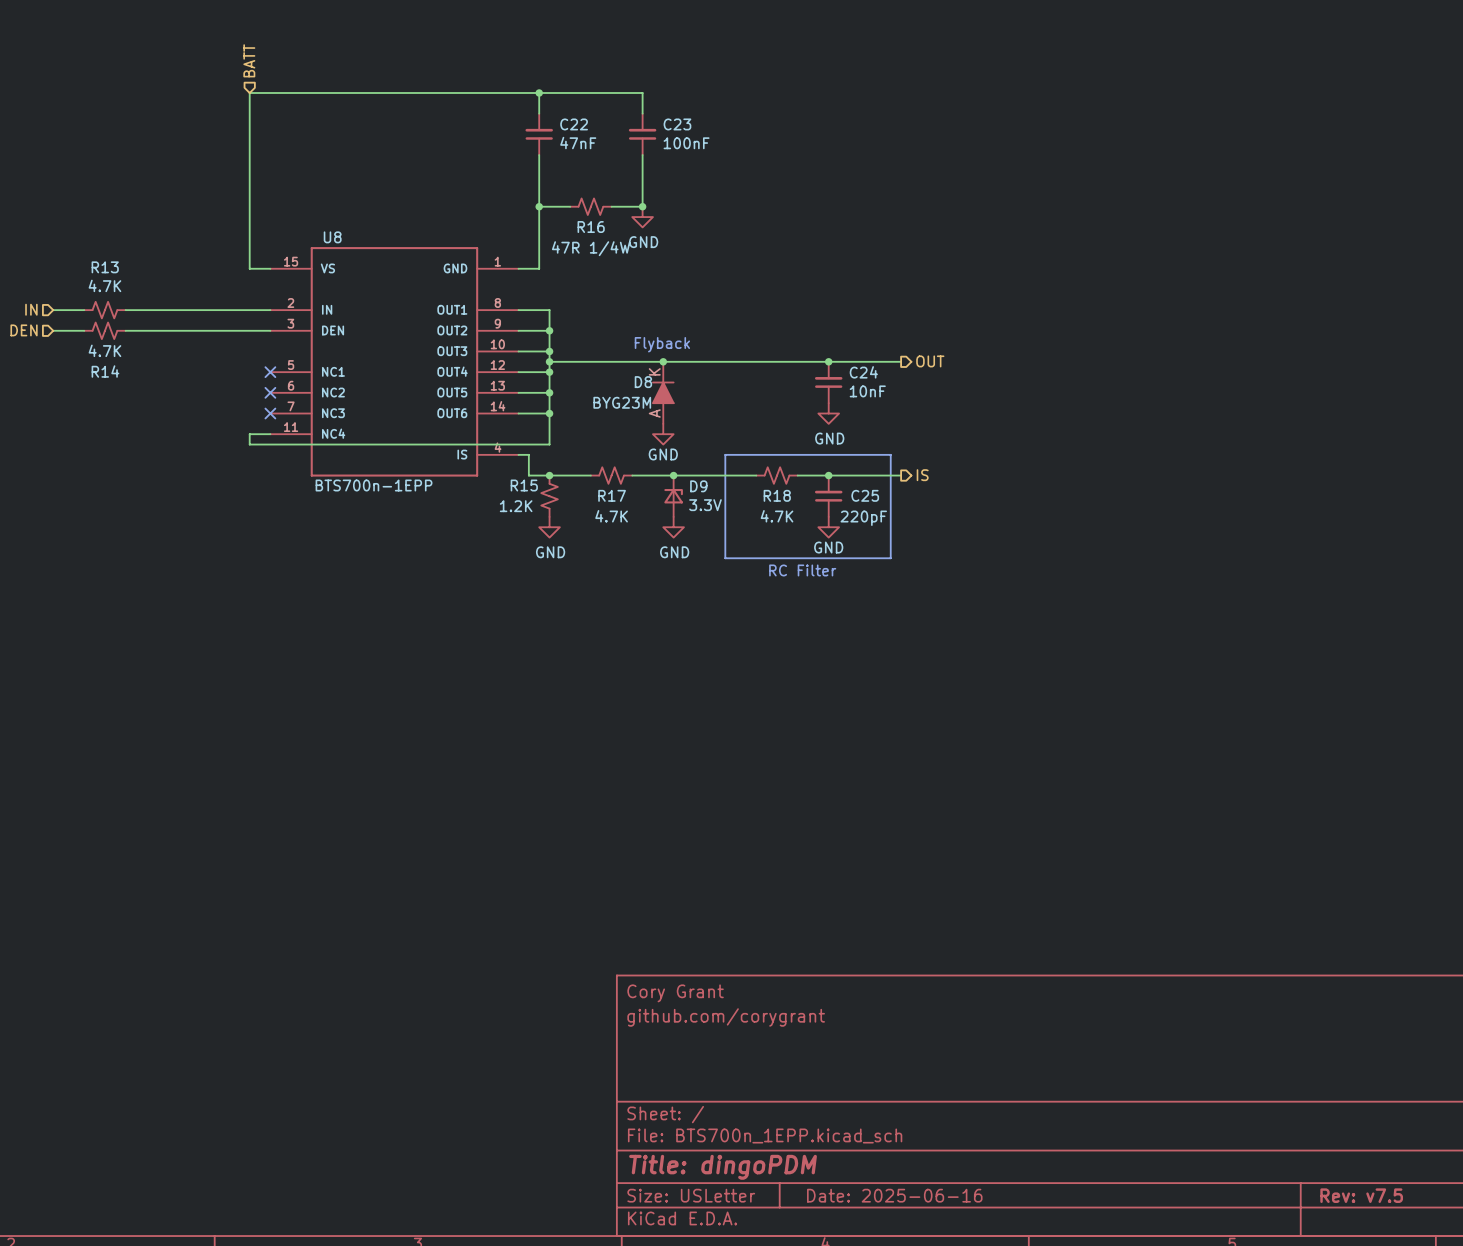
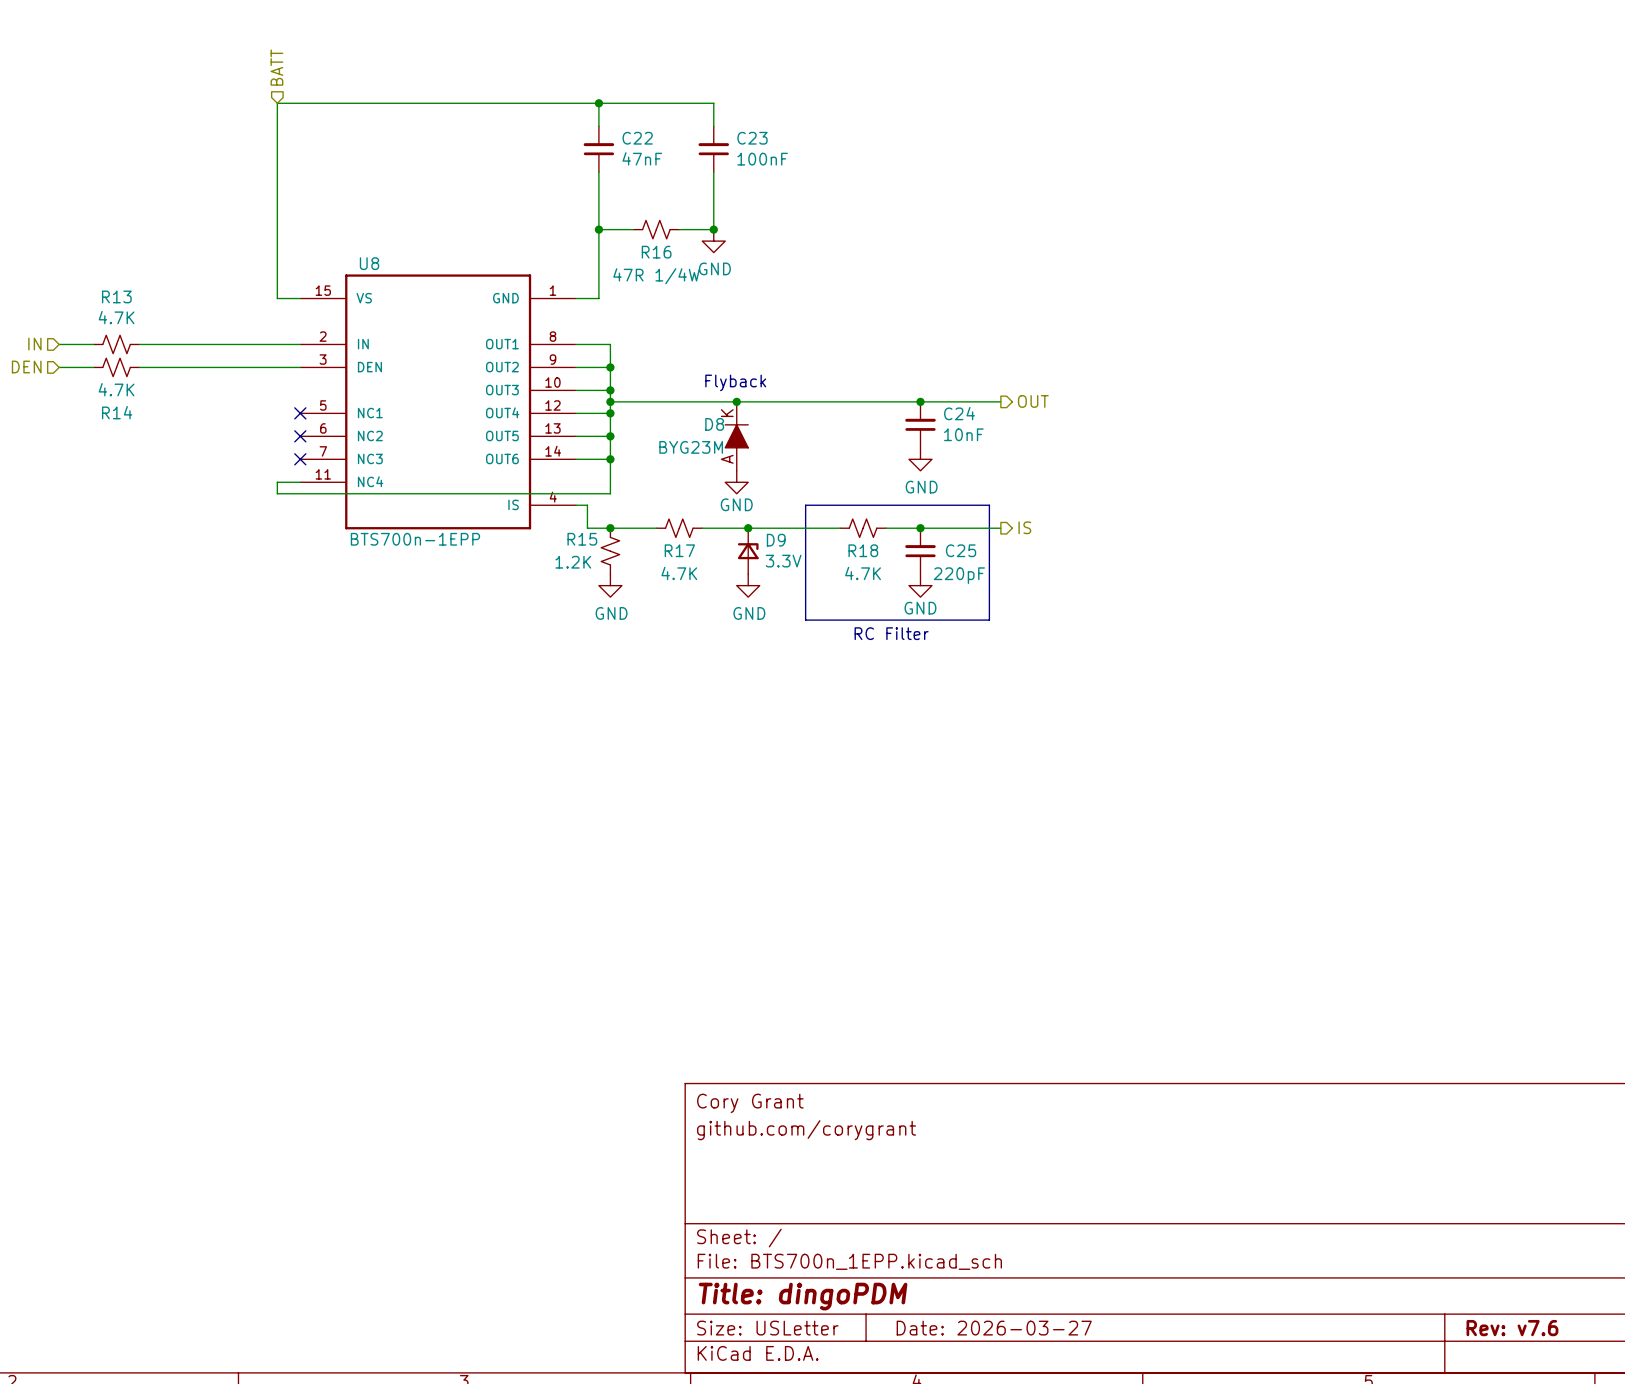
title block: Date: 2025-06-16 (894, 1195) -> Date: 2026-03-27 (994, 1328)
title block: Rev: v7.5 (1361, 1195) -> Rev: v7.6 (1512, 1328)

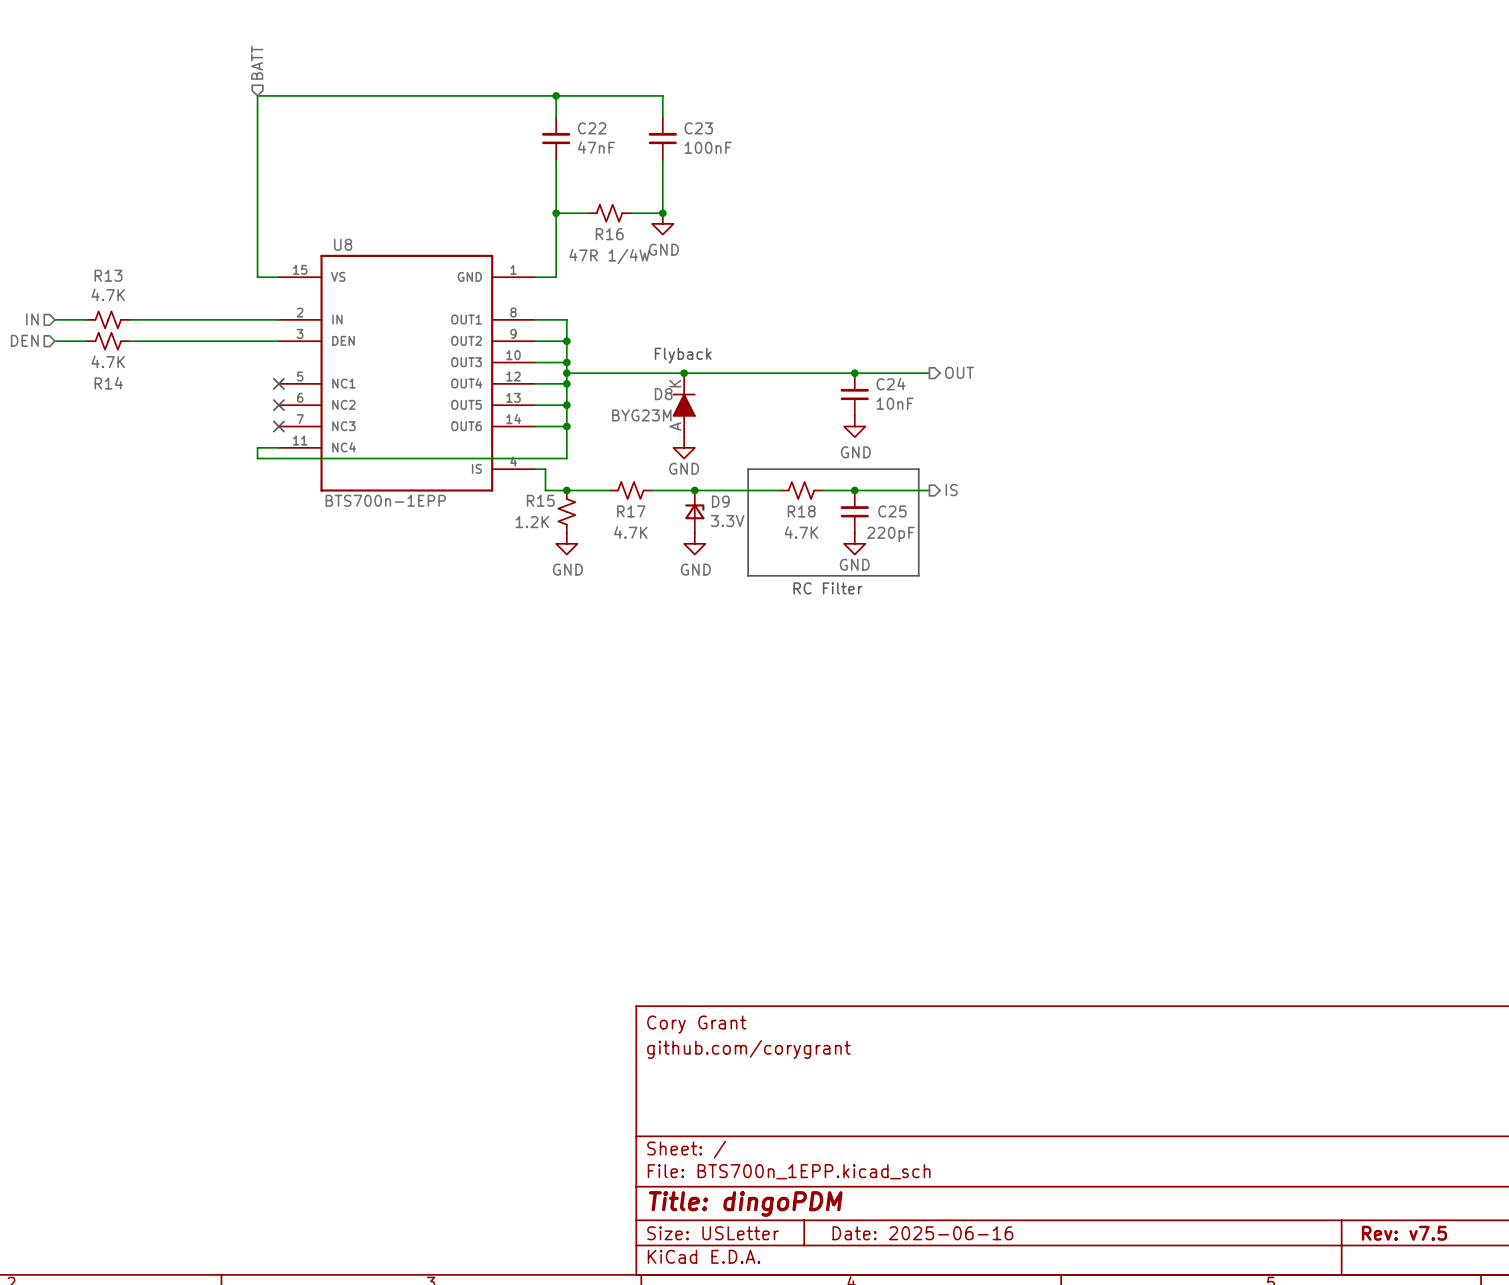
title block: Date: 2026-03-27 (994, 1328) -> Date: 2025-06-16 (922, 1233)
title block: Rev: v7.6 (1512, 1328) -> Rev: v7.5 (1404, 1233)

